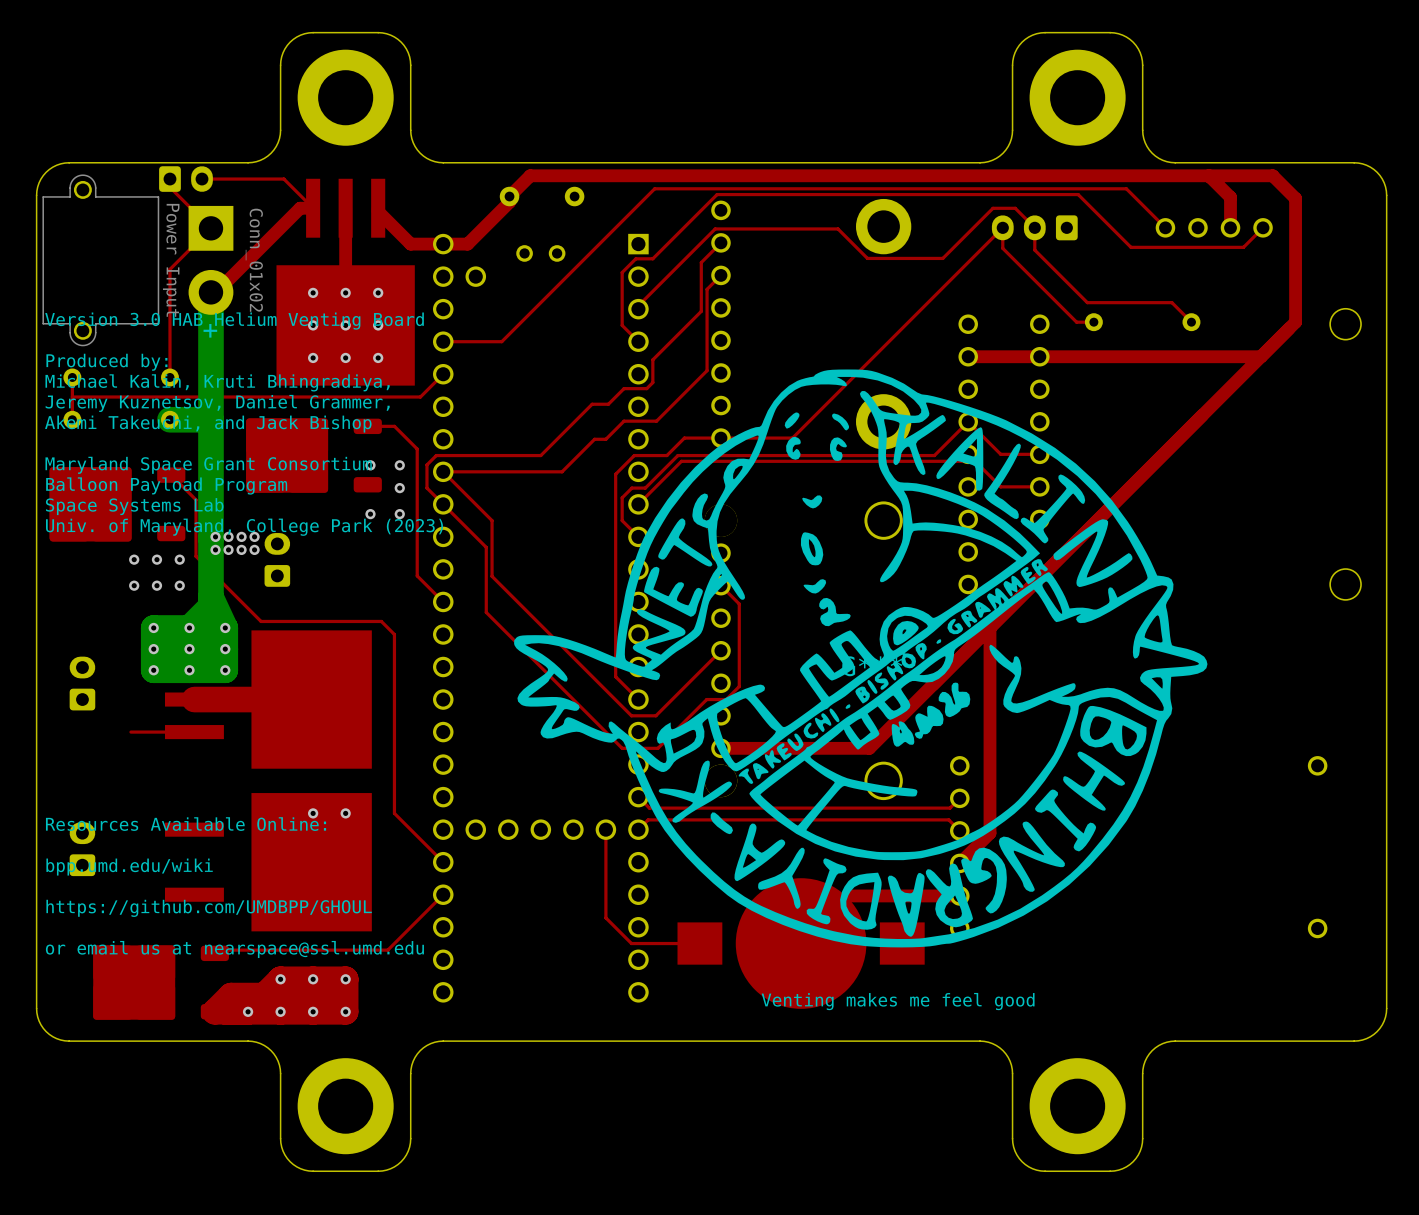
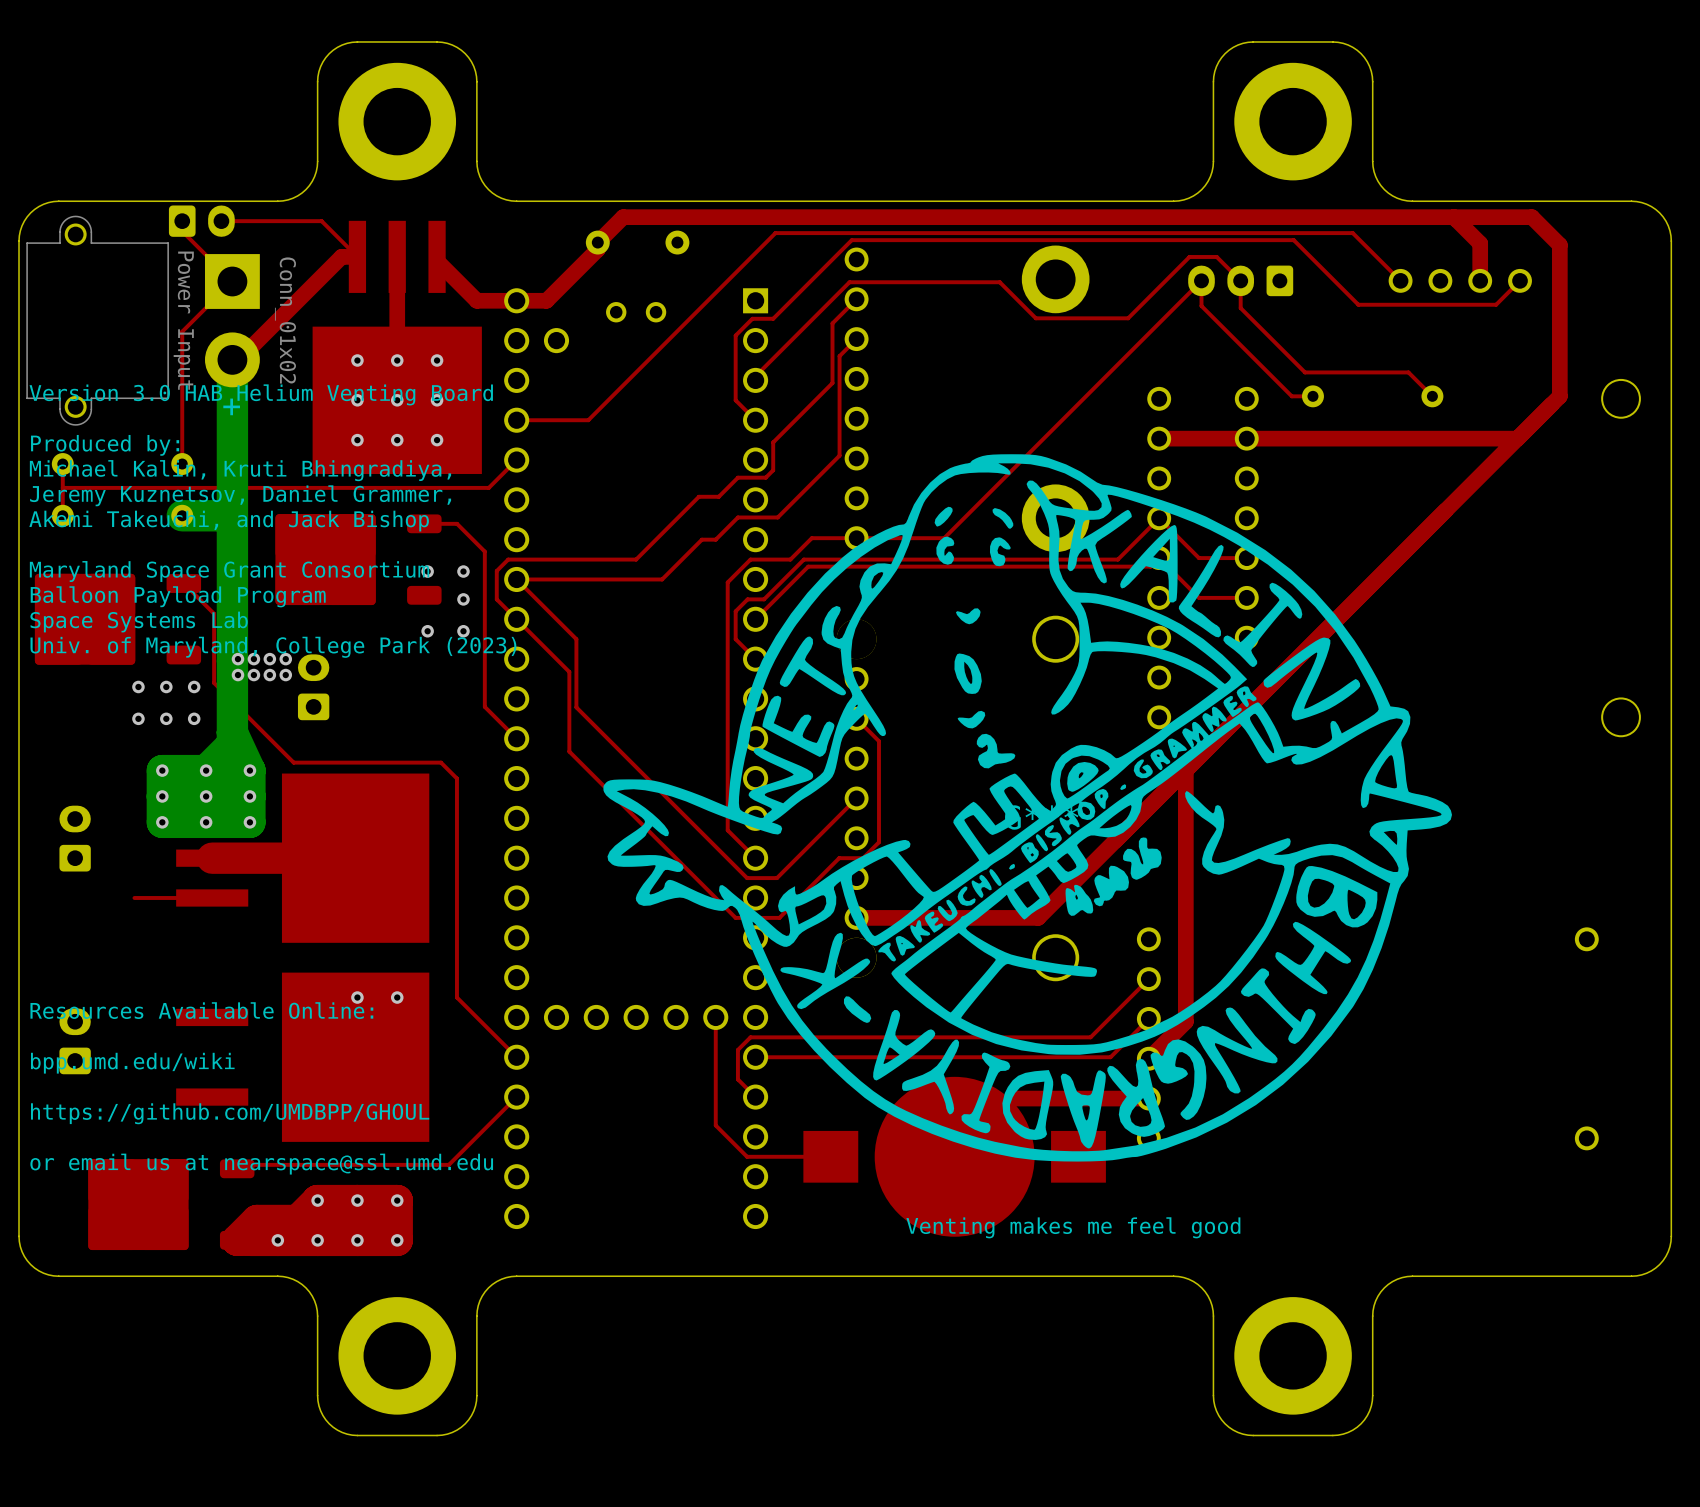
top track: (638, 797) (649, 808) (950, 808) -> (755, 1097) (737, 1079) (737, 1049) (750, 1037) (1090, 1037) (1136, 991)
top track: (638, 829) (648, 819) (948, 819) (959, 830) -> (755, 1057) (1110, 1057) (1148, 1018)

